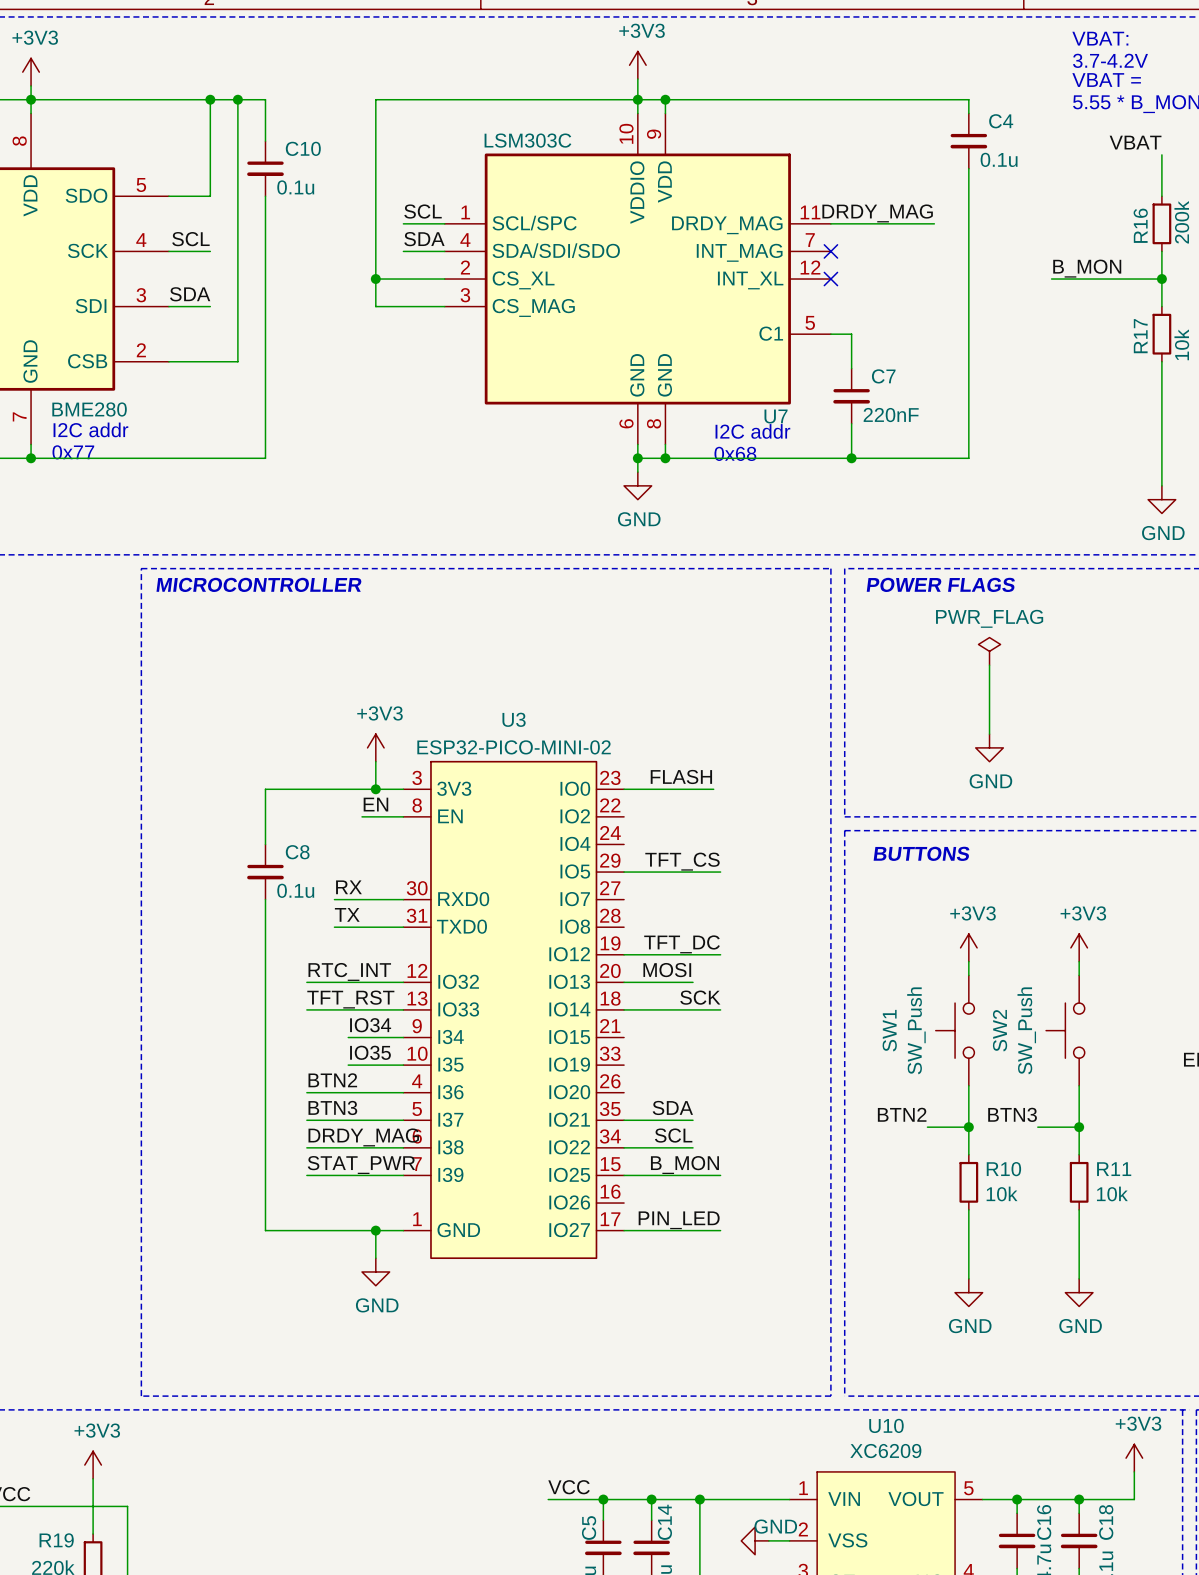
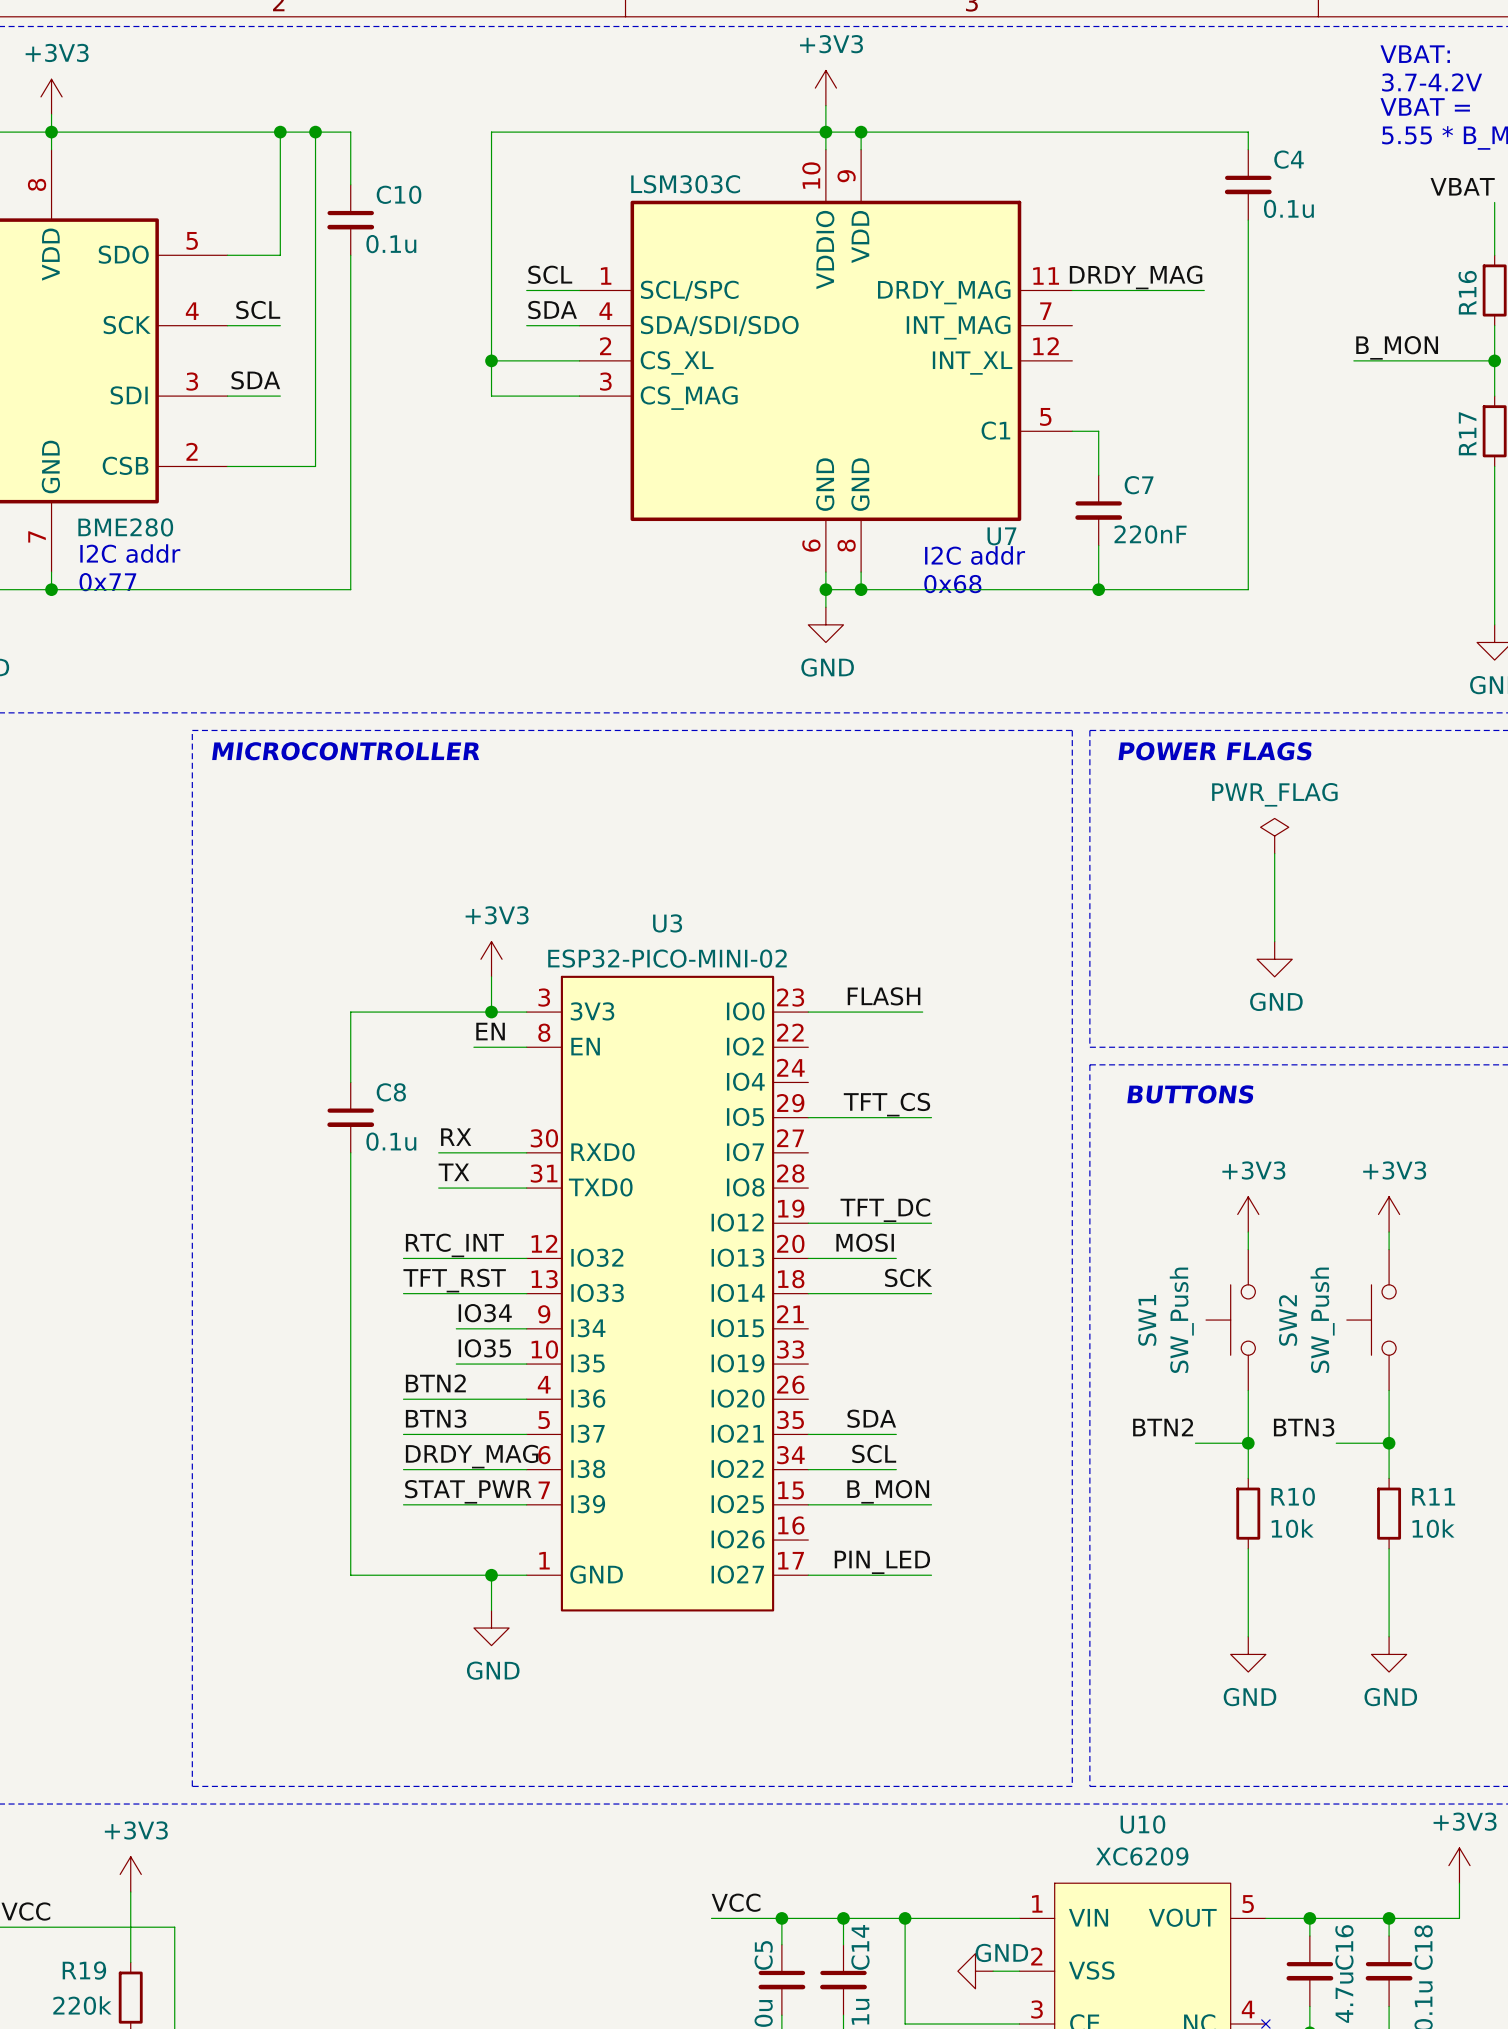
no-connect mark: (830, 251) -> none
no-connect mark: (830, 279) -> none

